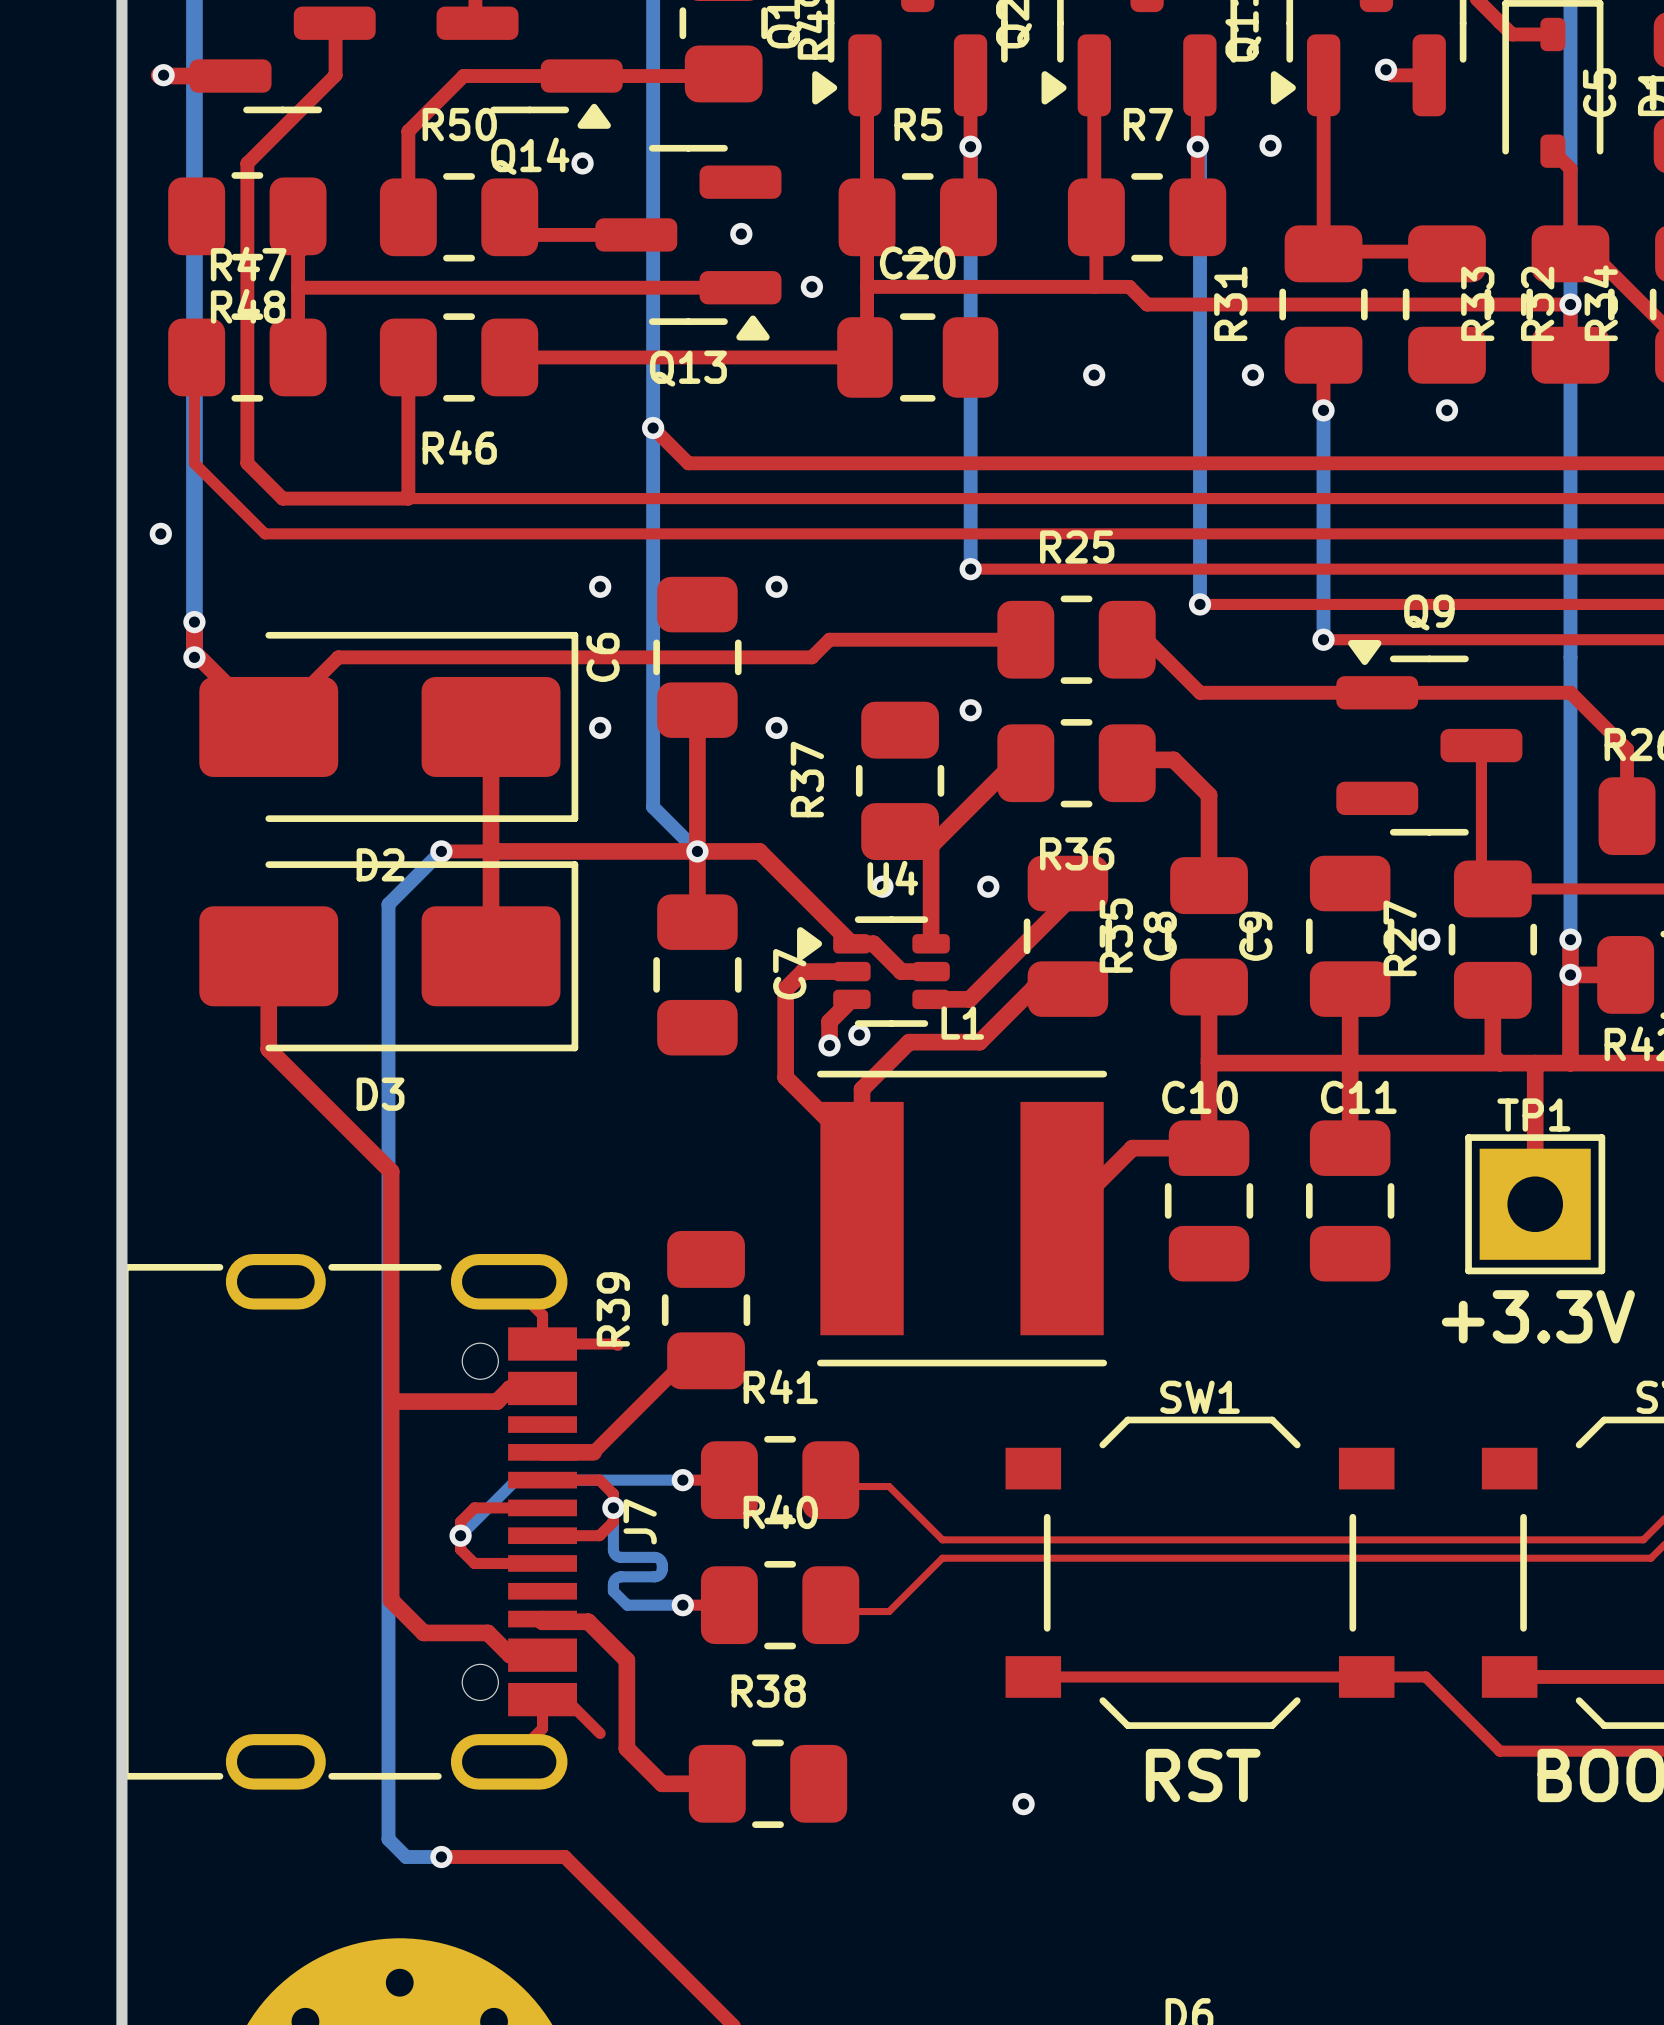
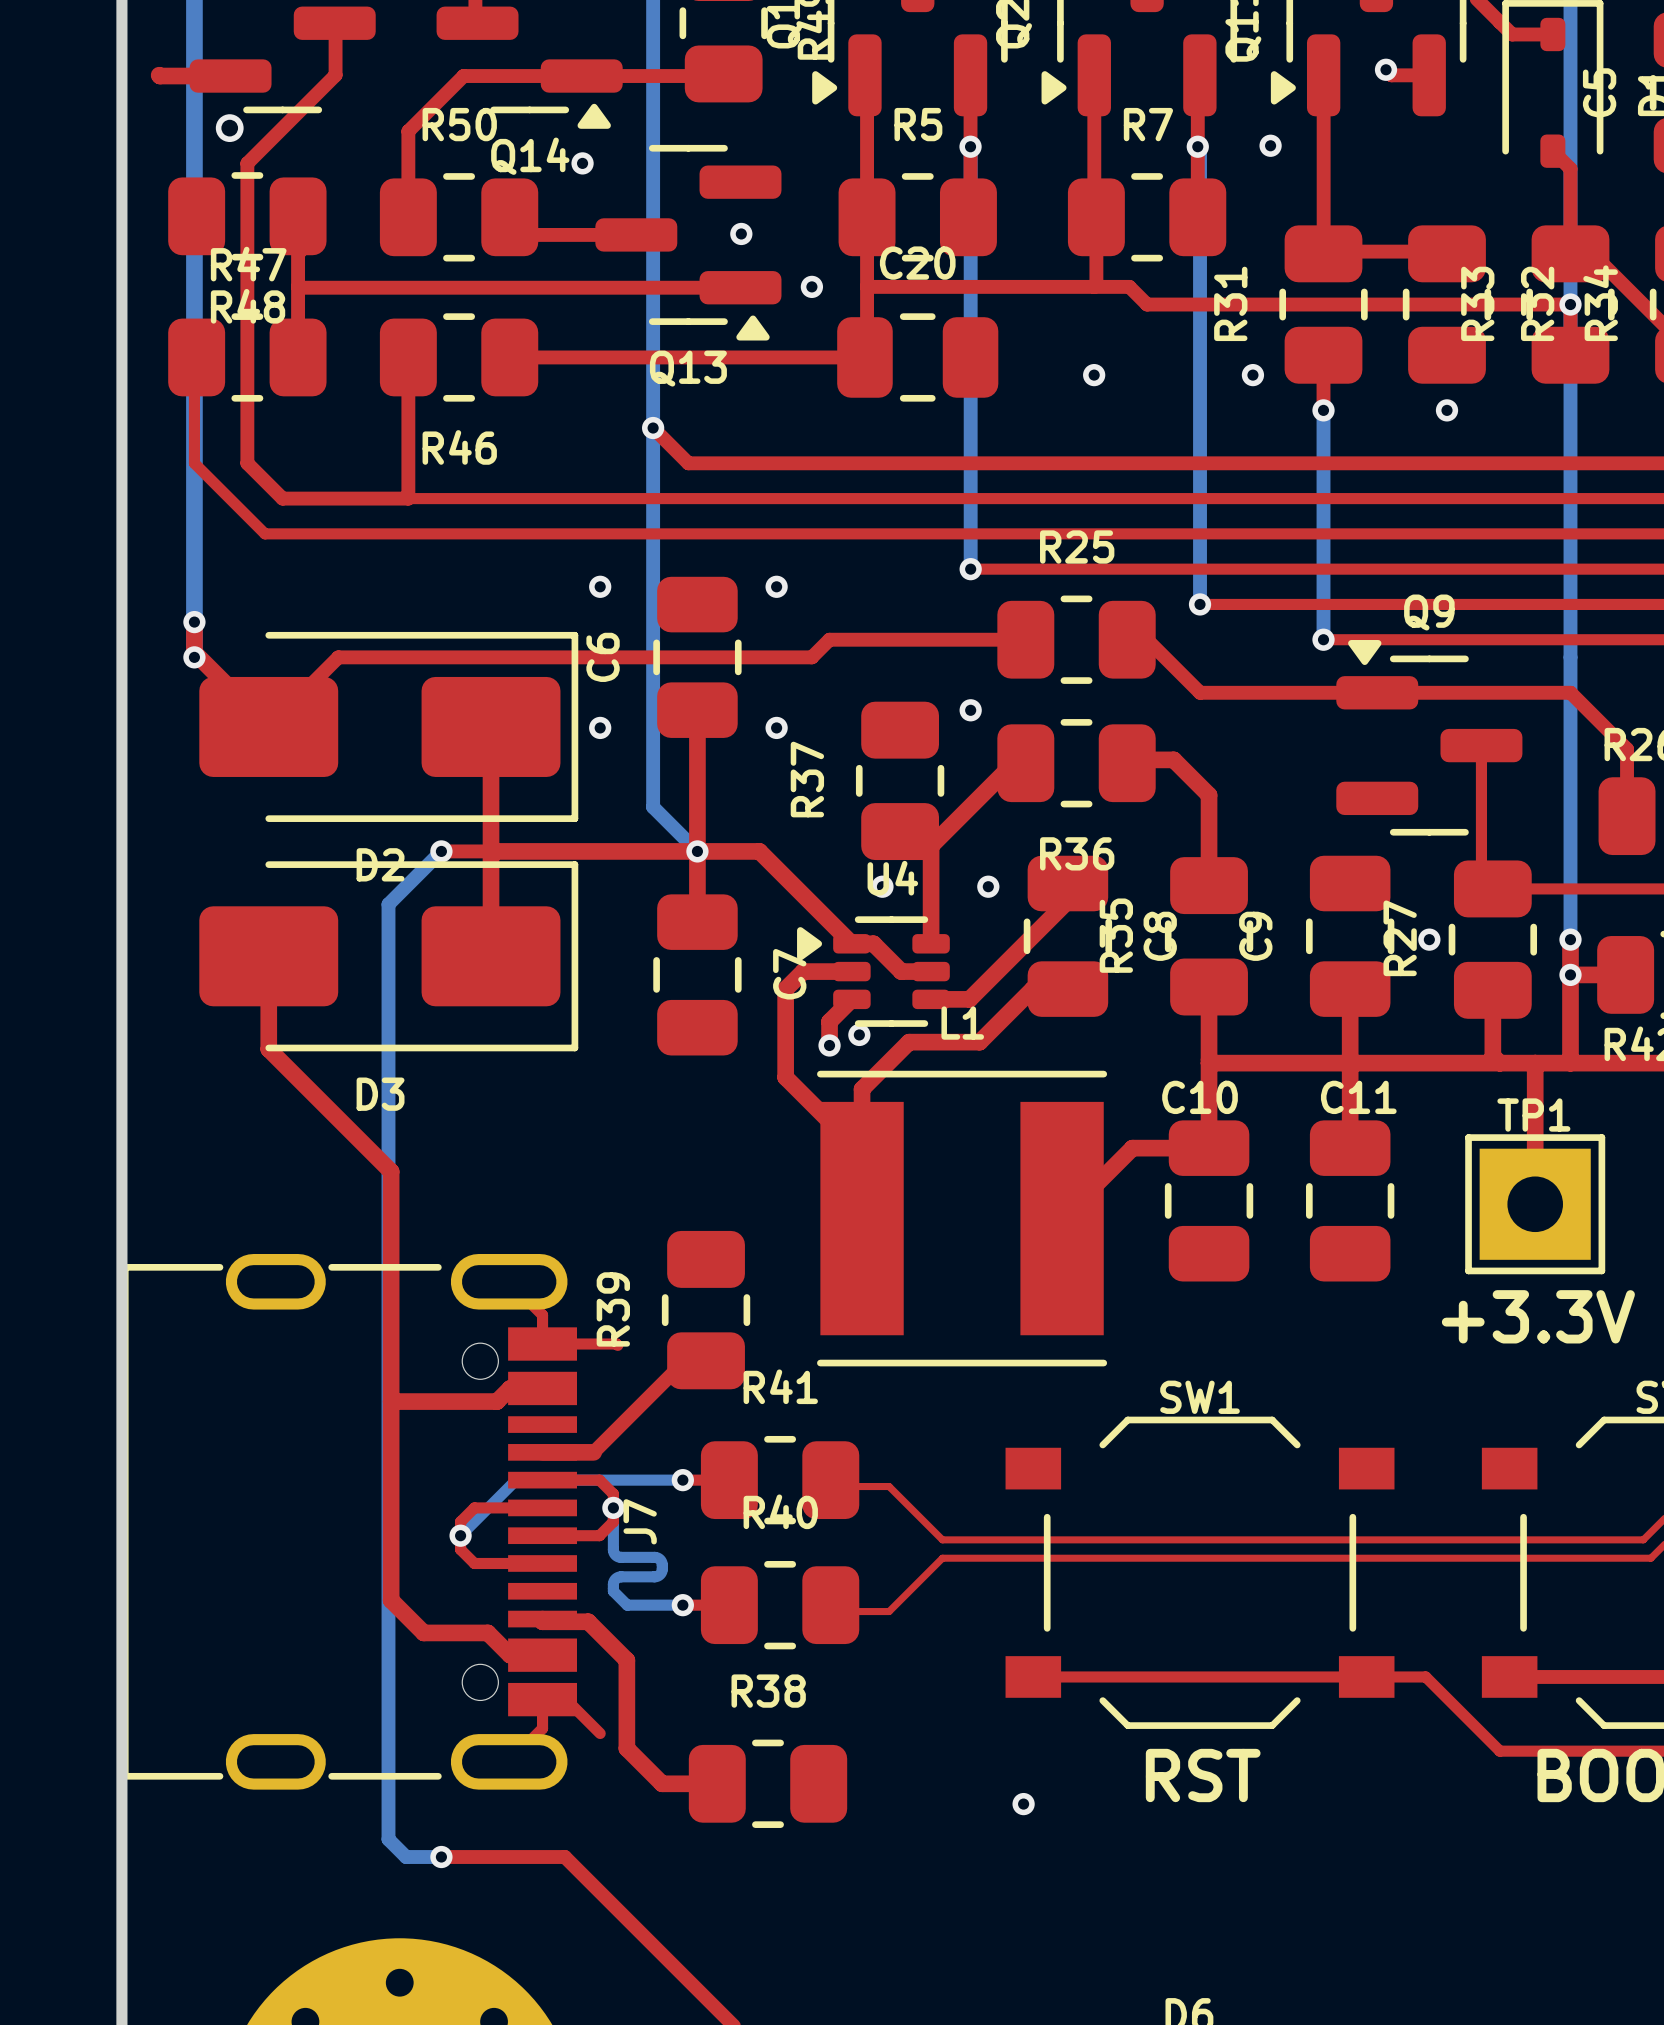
via: (163, 75) -> none
via: none -> (229, 128)
via: (160, 533) -> none

